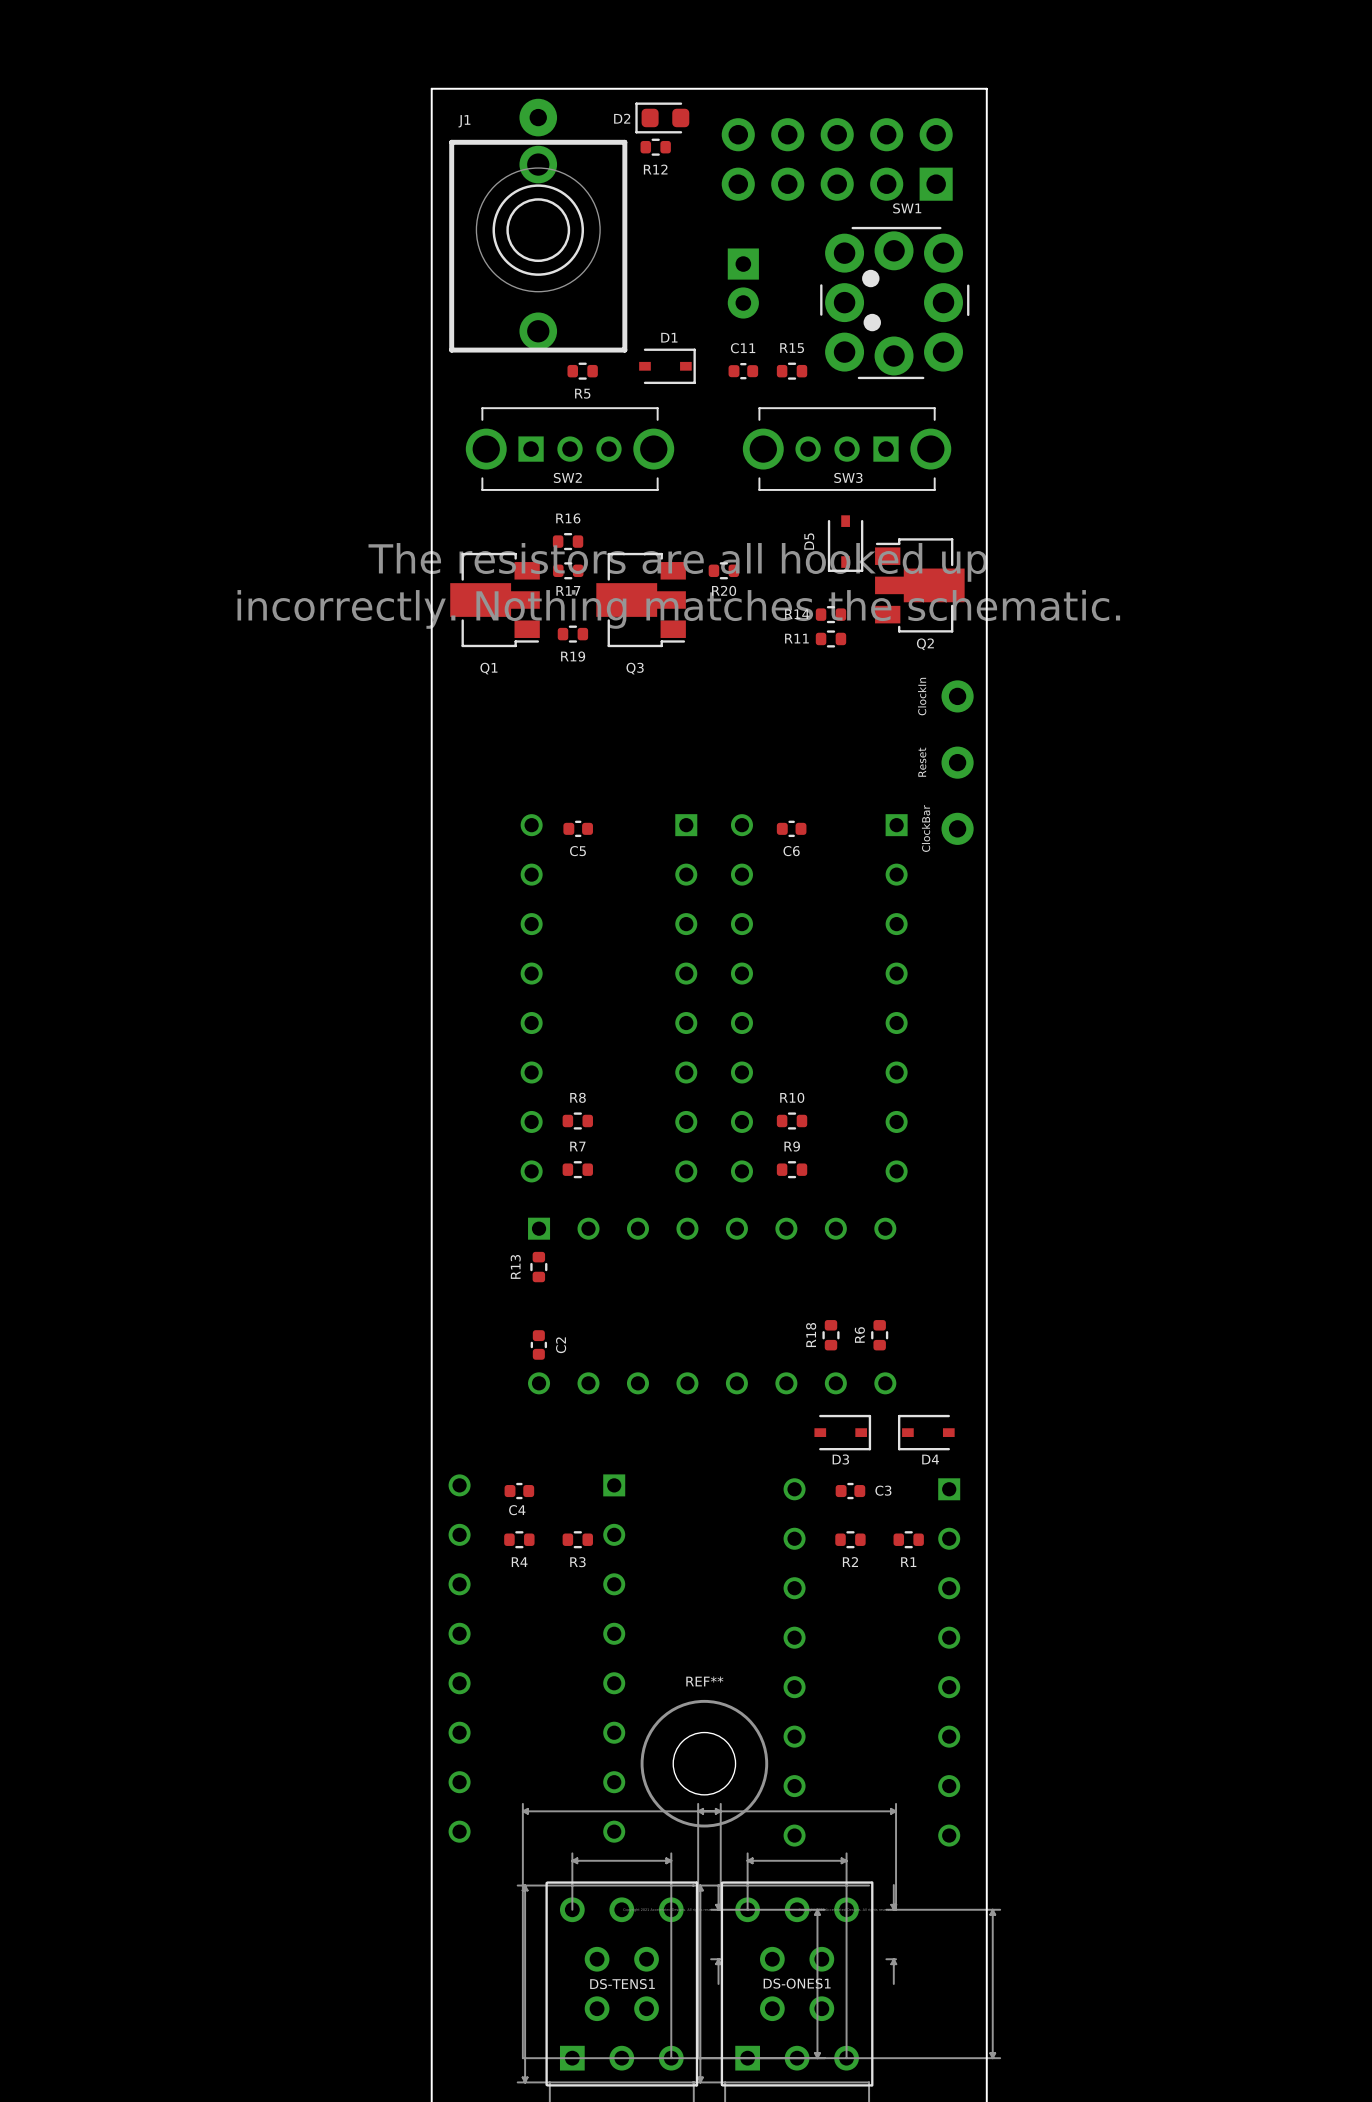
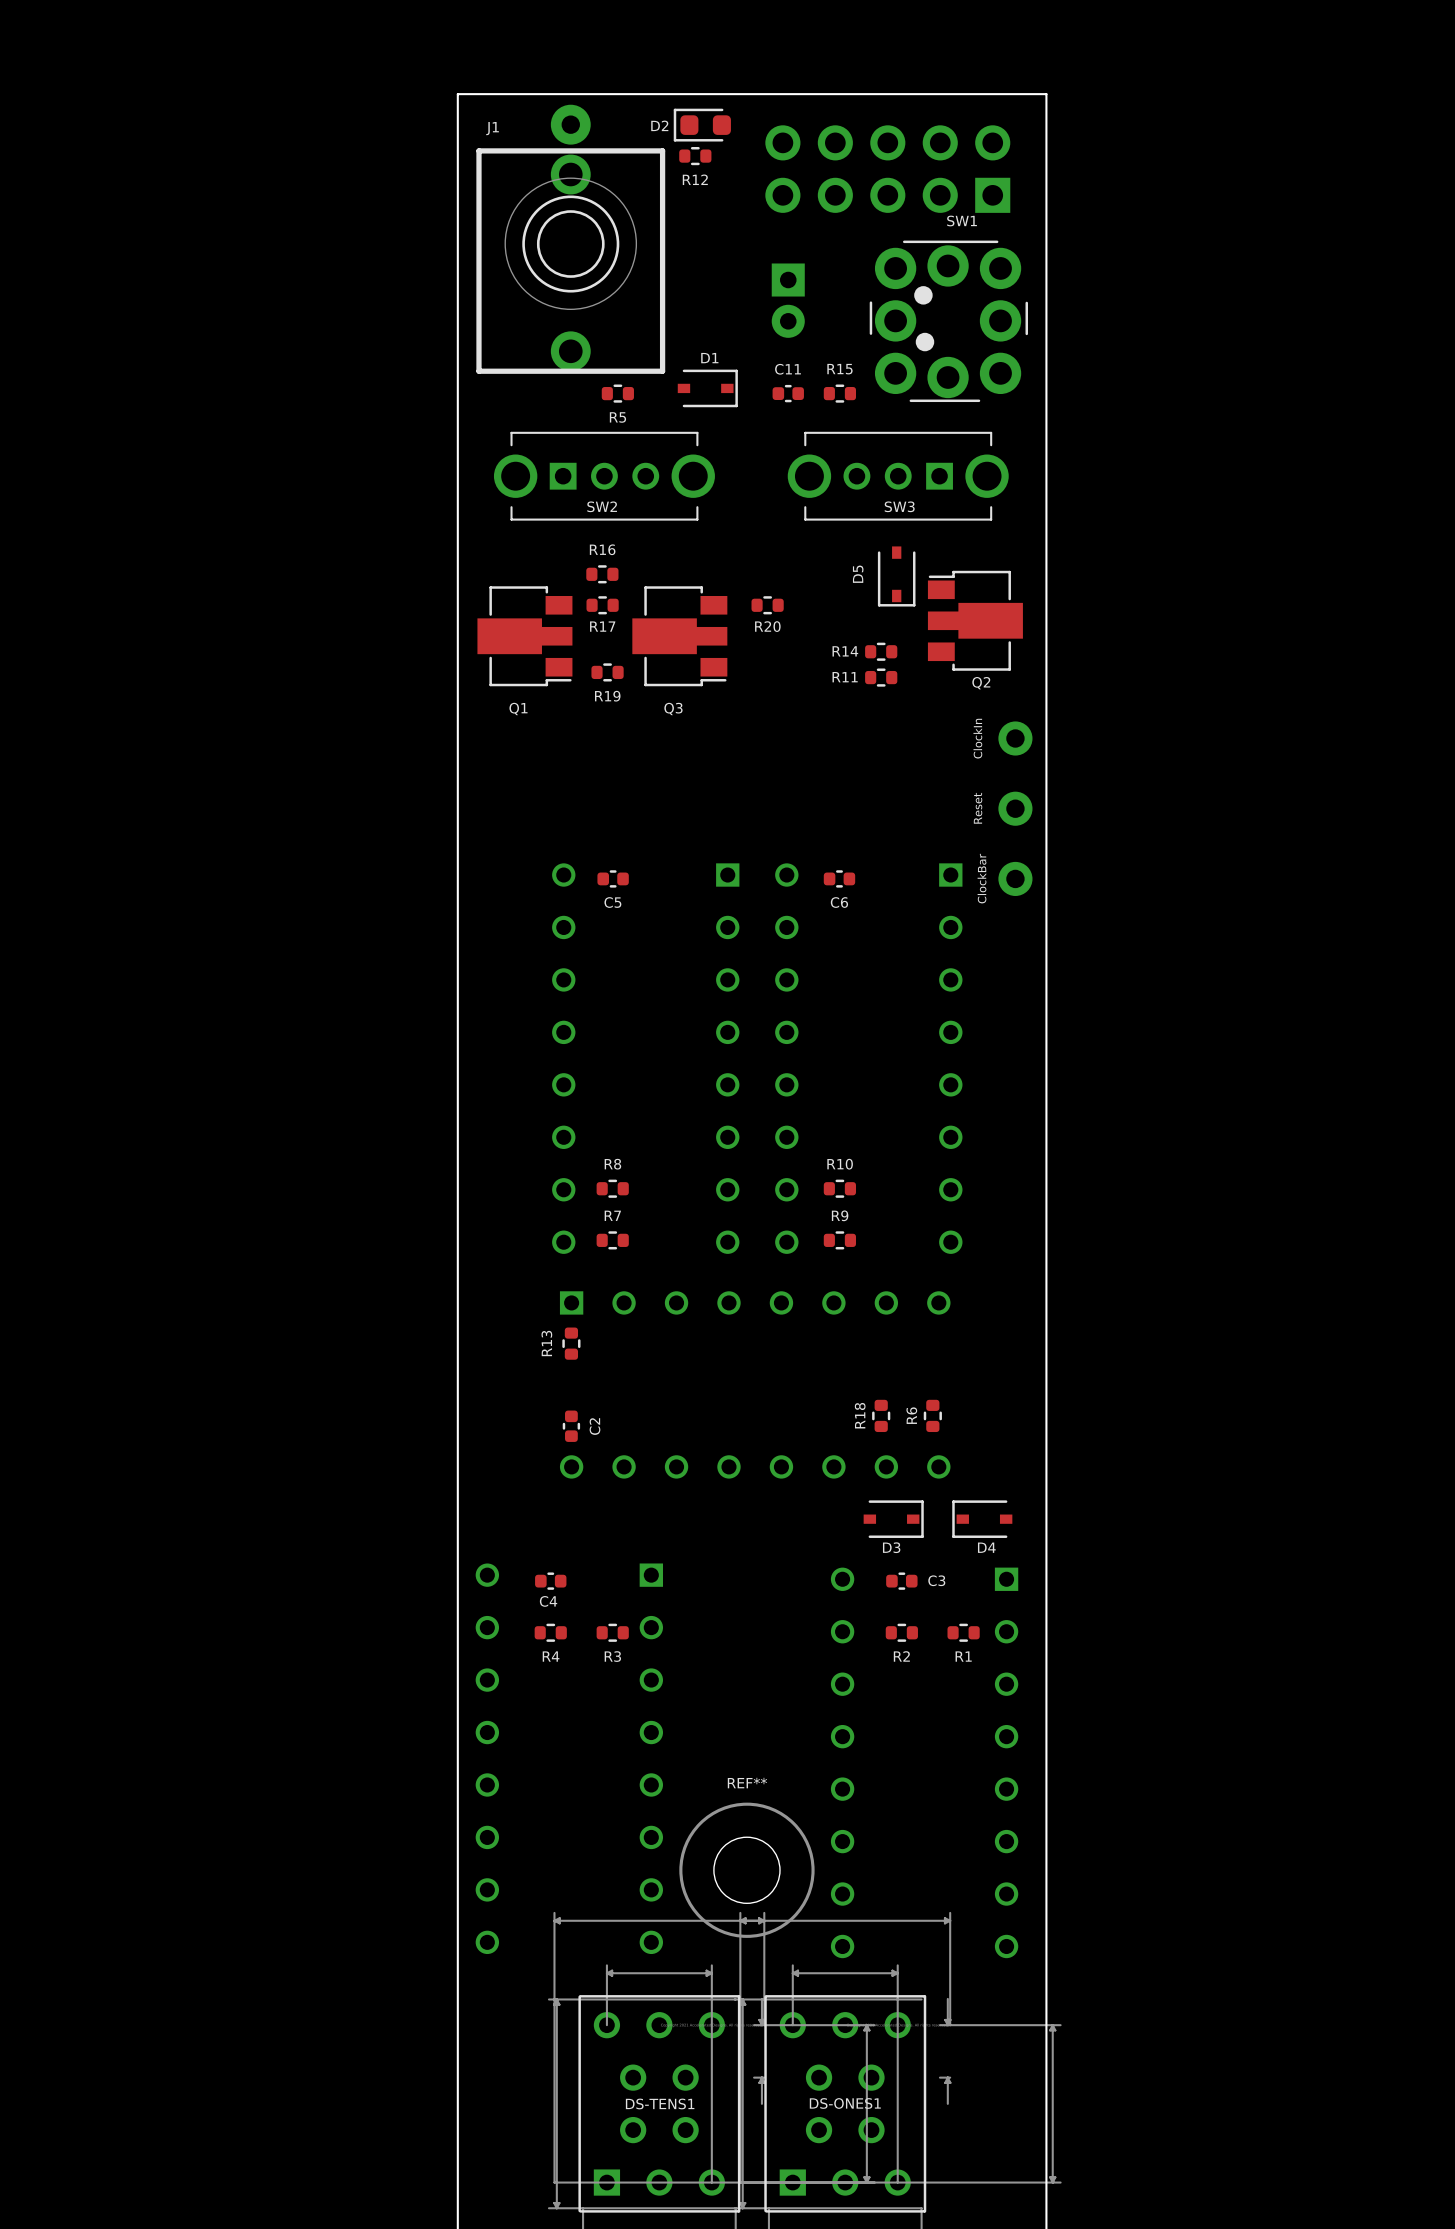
text: The resistors are all hooked up (677, 562) -> none
text: incorrectly. Nothing matches the schematic. (678, 609) -> none

